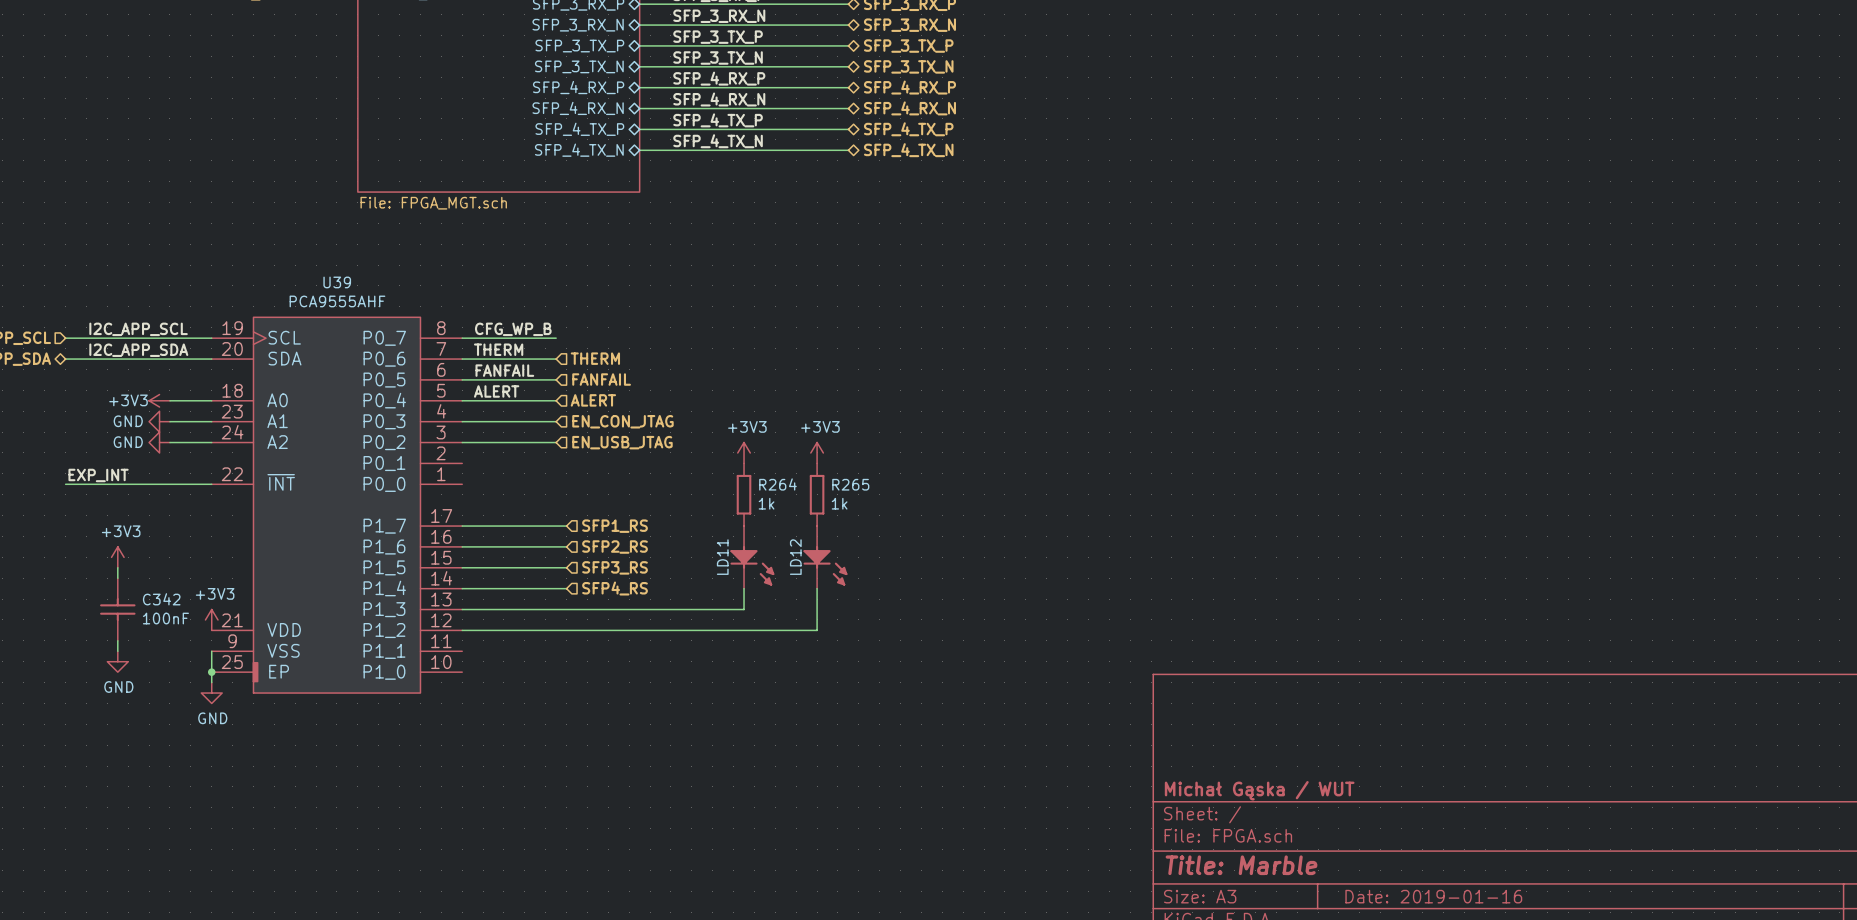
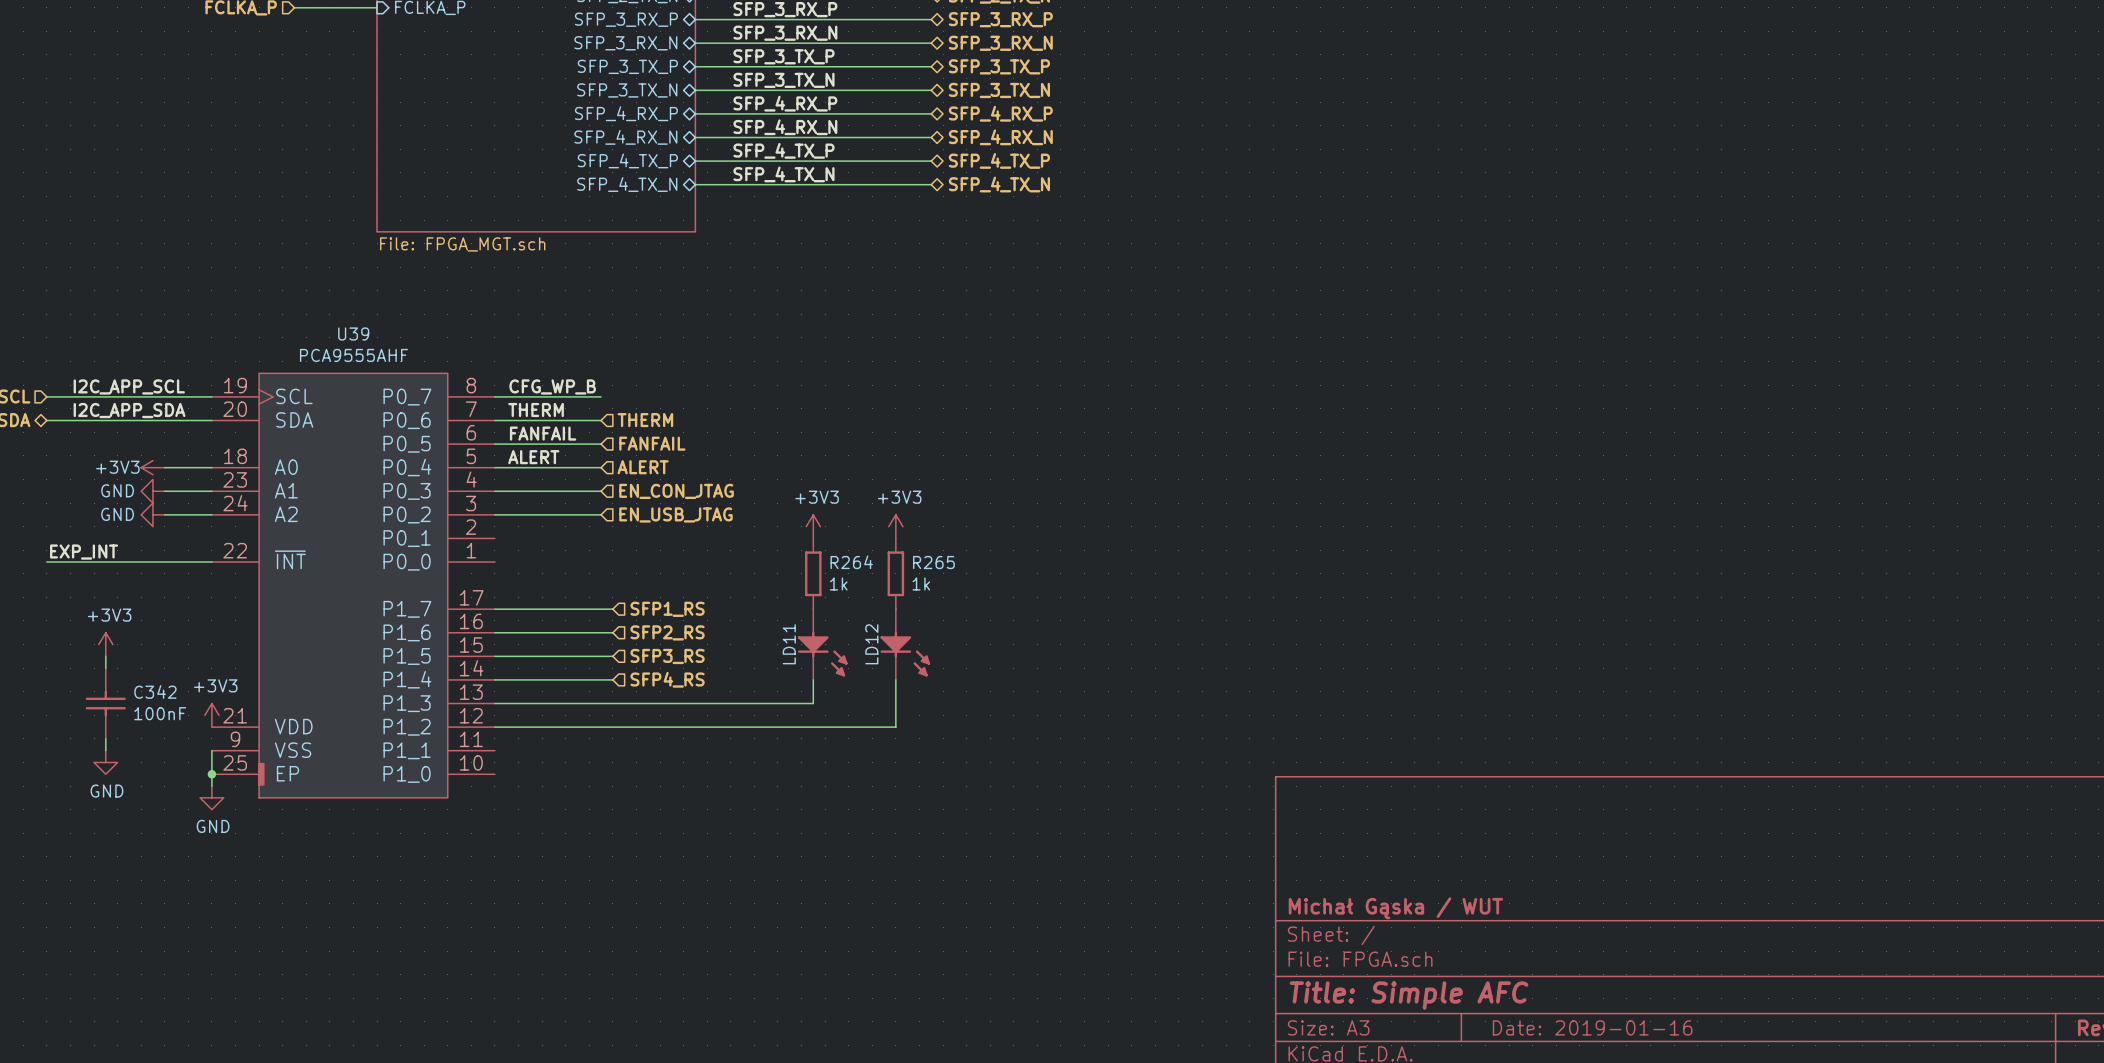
title block: Title: Marble (1241, 865) -> Title: Simple AFC (1409, 995)

